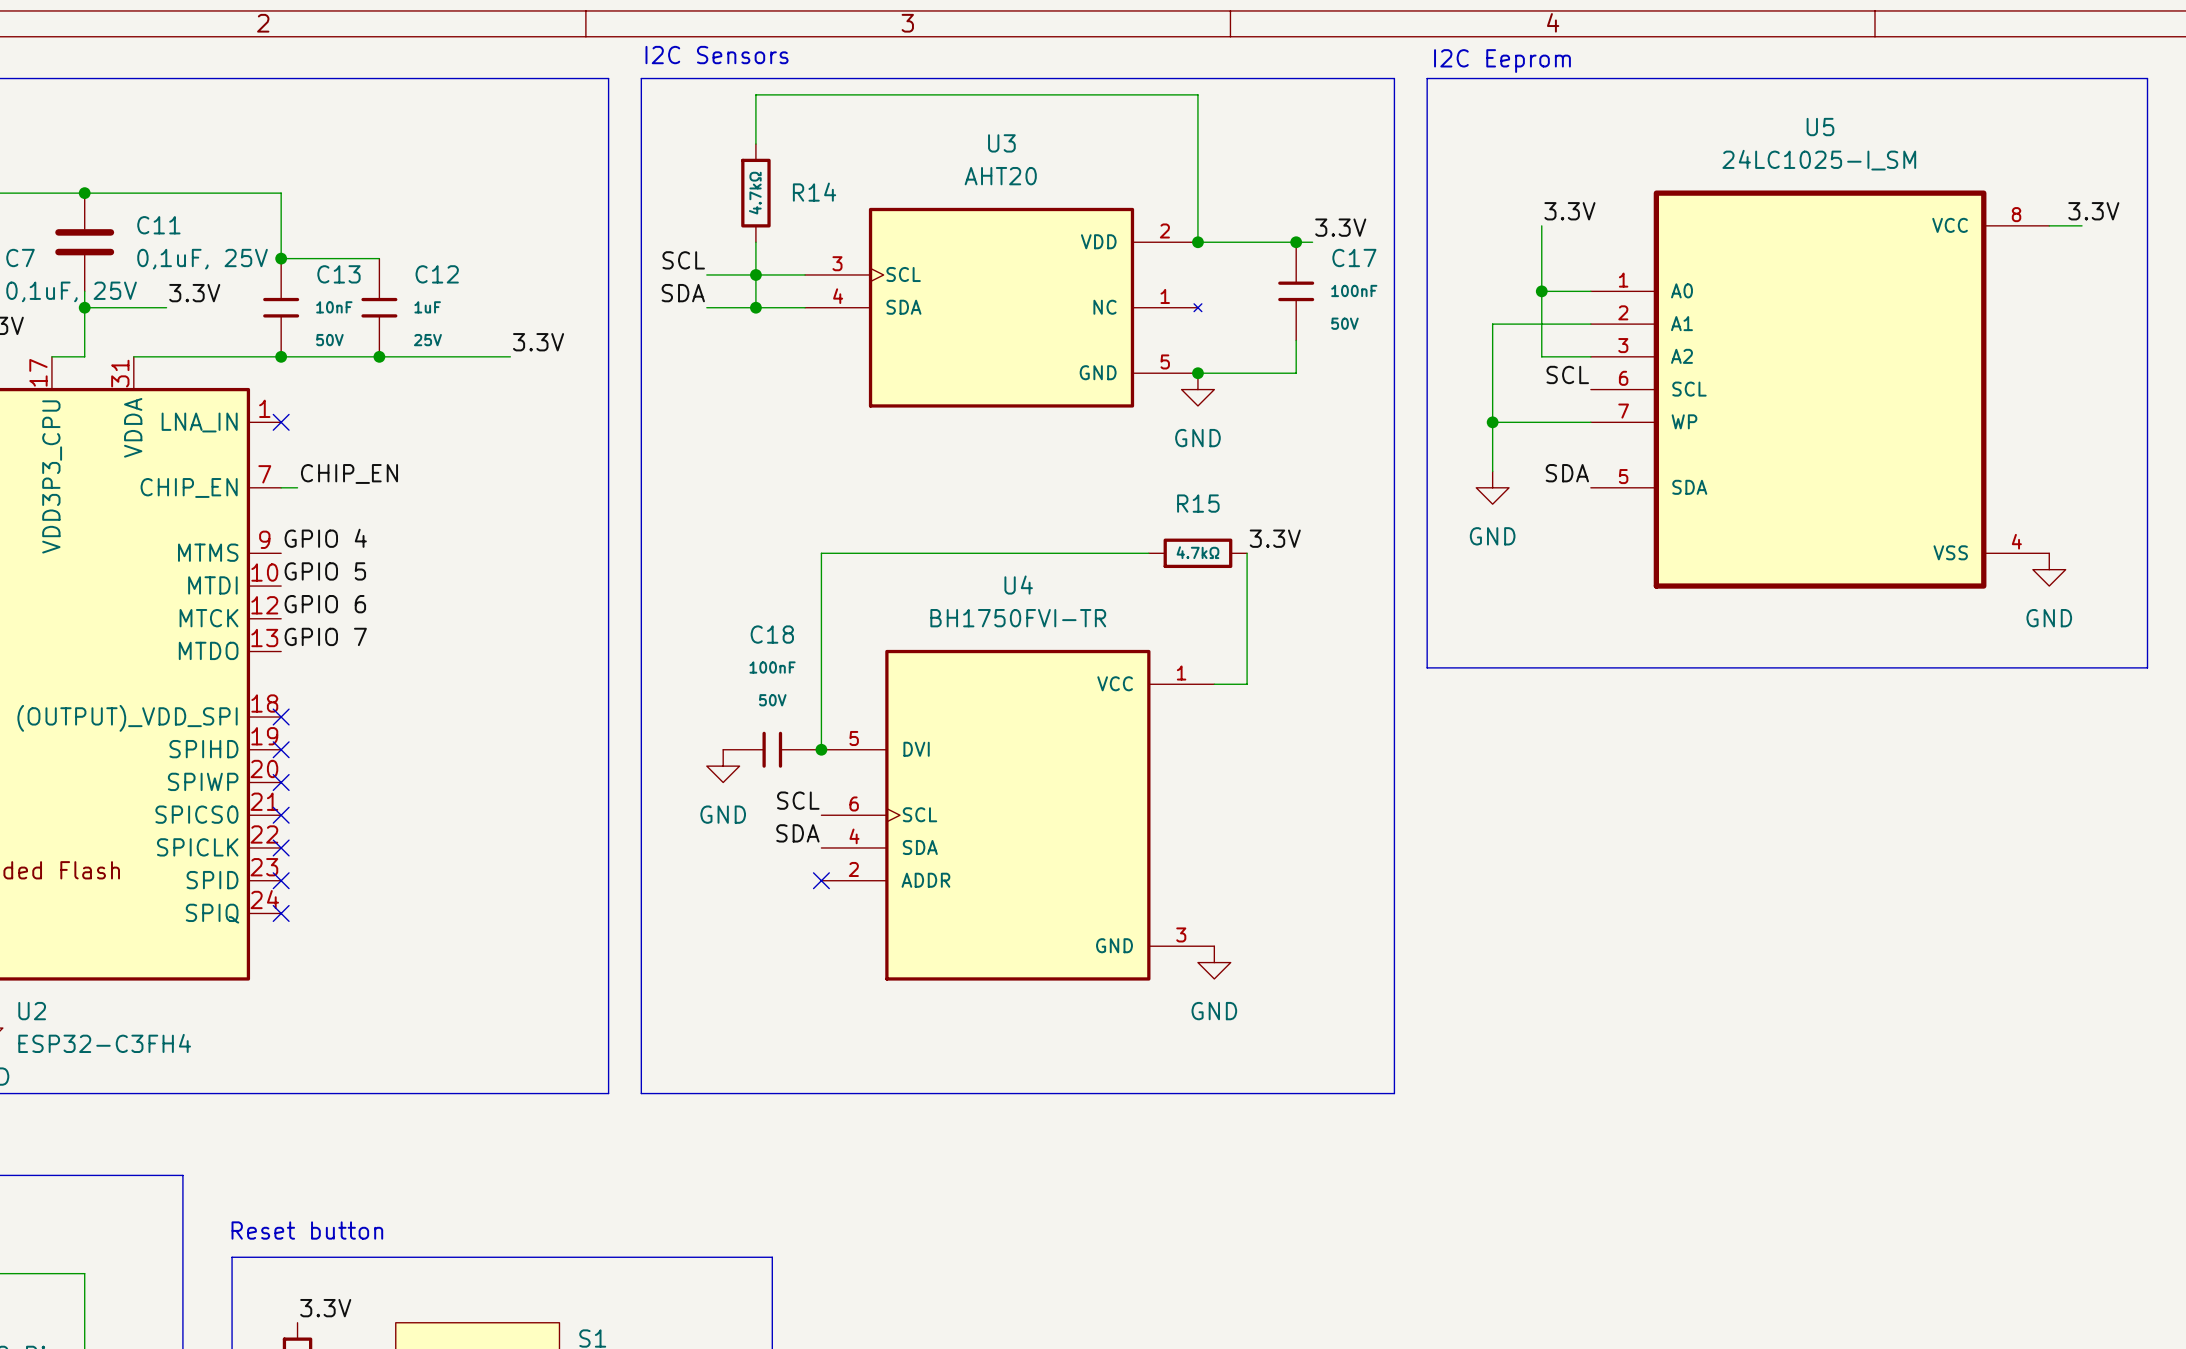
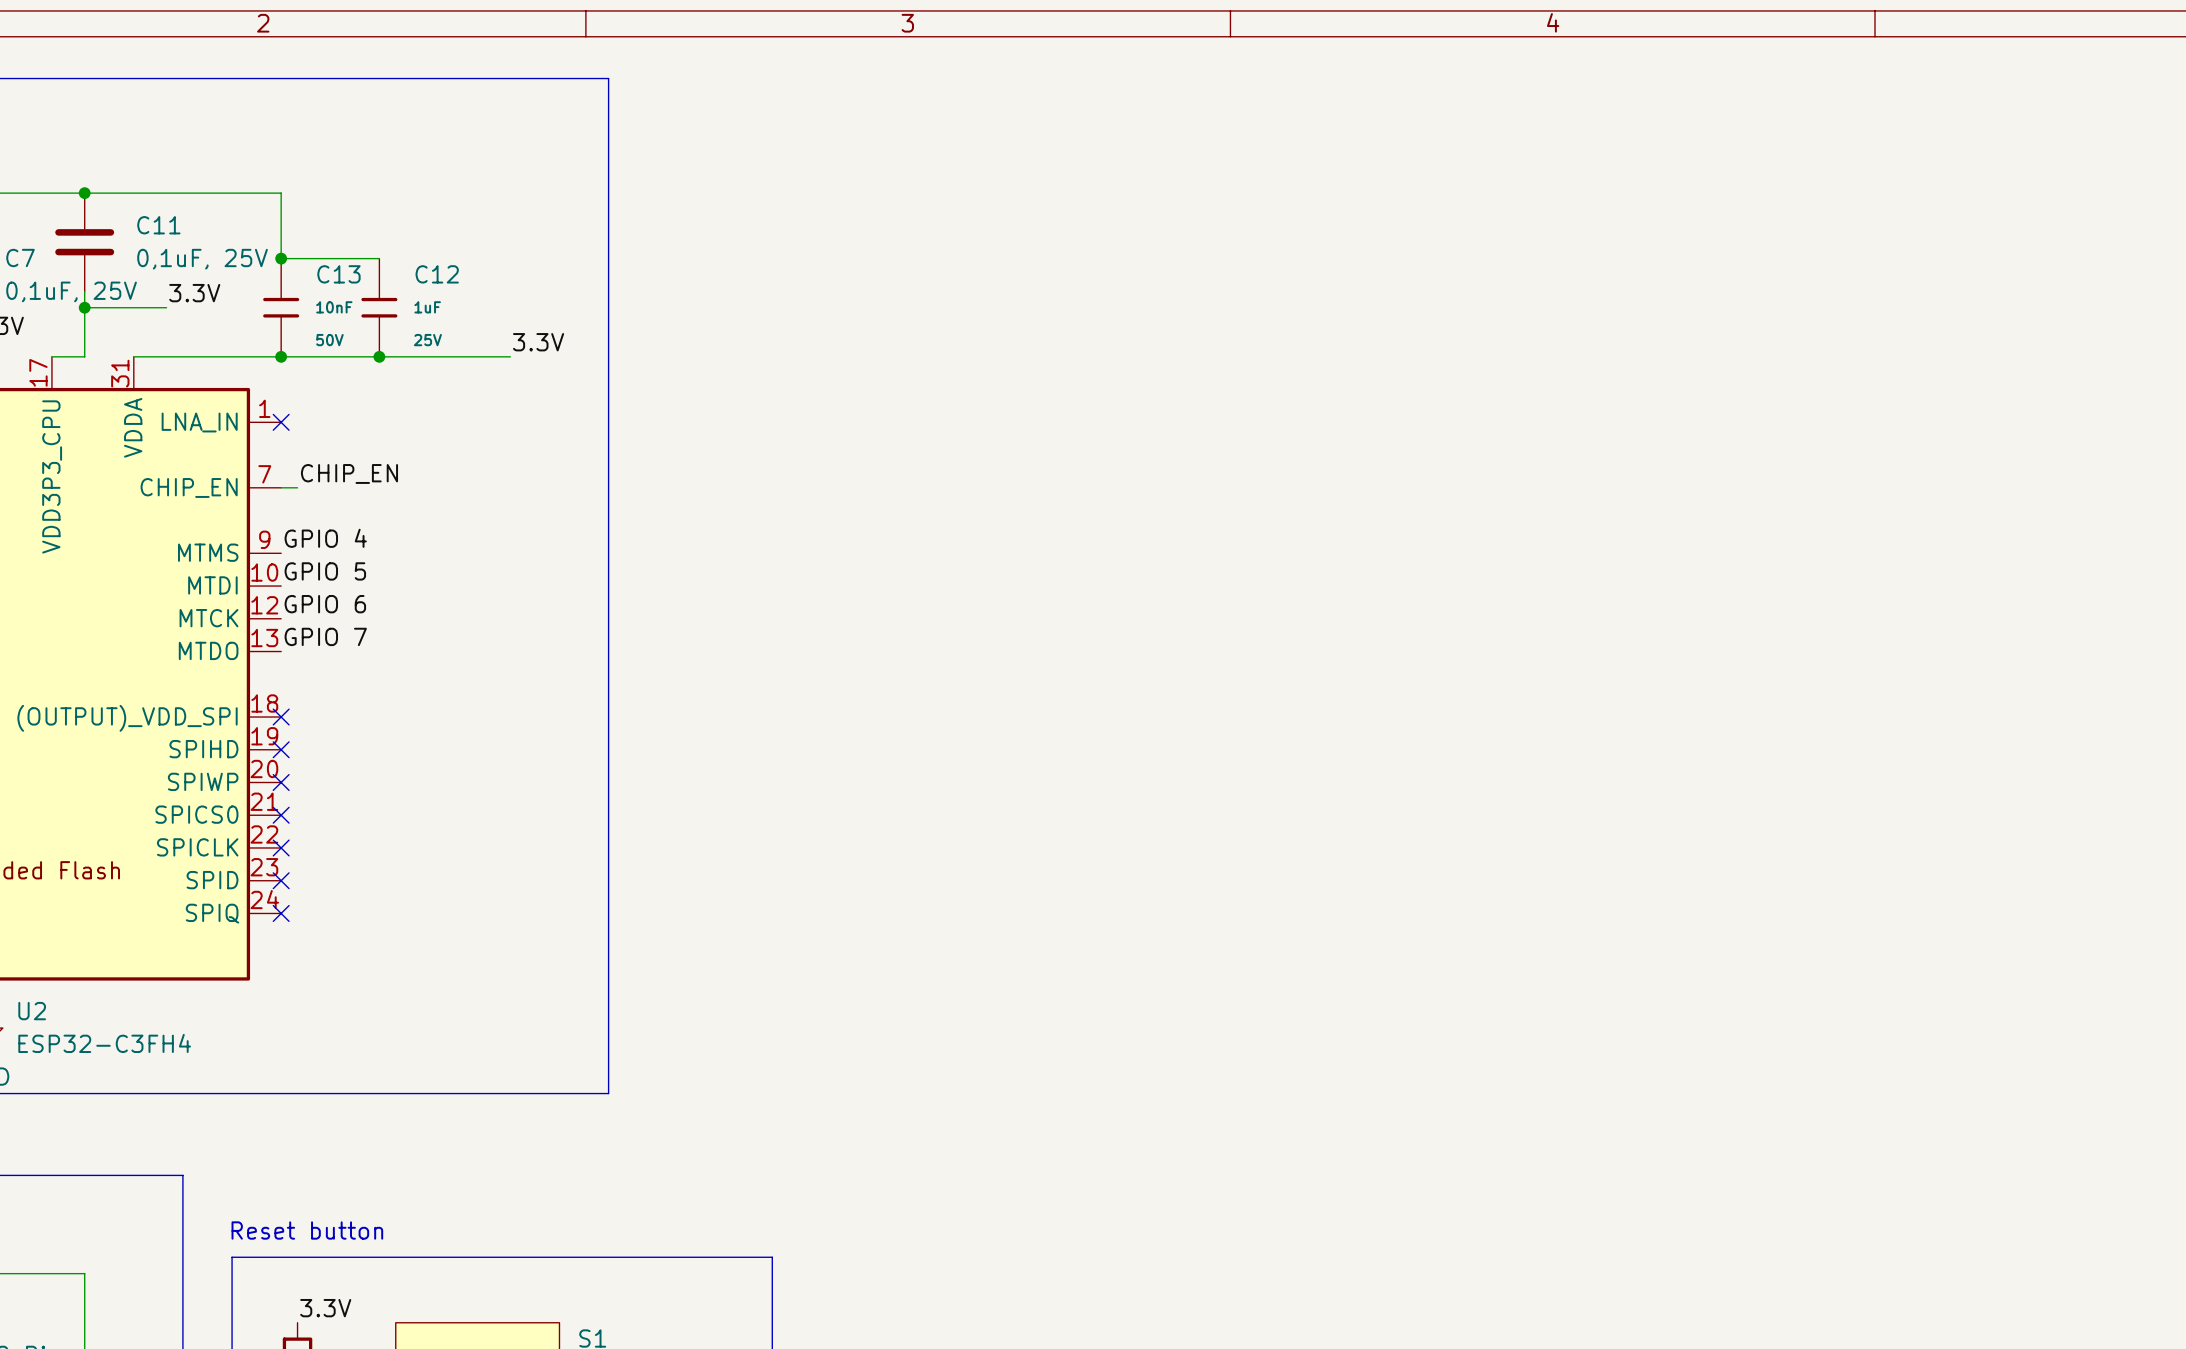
text: I2C Sensors (717, 55) -> none
text: I2C Eeprom (1502, 61) -> none
line: (641, 78) (1394, 78) (1394, 1093) (641, 1093) (641, 78) -> none
line: (1427, 78) (2147, 78) (2147, 667) (1427, 667) (1427, 78) -> none
wire: (755, 144) (755, 94) (1197, 94) (1197, 242) (1312, 242) -> none
R14: 4.7kΩ (755, 193) -> none
label: 3.3V (1569, 211) -> none
label: 3.3V (2093, 211) -> none
wire: (1541, 225) (1541, 356) (1590, 356) -> none
wire: (2049, 225) (2082, 225) -> none
label: 3.3V (1340, 227) -> none
wire: (755, 242) (755, 307) -> none
junction: (1197, 242) -> none
junction: (1296, 242) -> none
label: SCL (683, 260) -> none
wire: (706, 274) (805, 274) -> none
junction: (755, 274) -> none
C17: 100nF (1296, 291) -> none
wire: (1541, 291) (1590, 291) -> none
junction: (1541, 291) -> none
label: SDA (683, 293) -> none
wire: (706, 307) (805, 307) -> none
junction: (755, 307) -> none
U3: AHT20 (1003, 307) -> none
wire: (1590, 324) (1492, 324) (1492, 471) -> none
wire: (1296, 340) (1296, 373) (1197, 373) -> none
junction: (1197, 373) -> none
label: SCL (1567, 374) -> none
power symbol: GND (1197, 389) -> none
U5: 24LC1025-I_SM (1820, 389) -> none
wire: (1492, 422) (1590, 422) -> none
junction: (1492, 422) -> none
label: SDA (1567, 473) -> none
power symbol: GND (1492, 487) -> none
label: 3.3V (1275, 538) -> none
wire: (1148, 553) (821, 553) (821, 749) -> none
R15: 4.7kΩ (1197, 553) -> none
wire: (1247, 553) (1247, 684) (1214, 684) -> none
power symbol: GND (2049, 569) -> none
C18: 100nF (772, 749) -> none
junction: (821, 749) -> none
power symbol: GND (723, 766) -> none
label: SCL (798, 800) -> none
U4: BH1750FVI-TR (1017, 815) -> none
label: SDA (797, 833) -> none
no-connect mark: (821, 880) -> none
power symbol: GND (1214, 962) -> none

